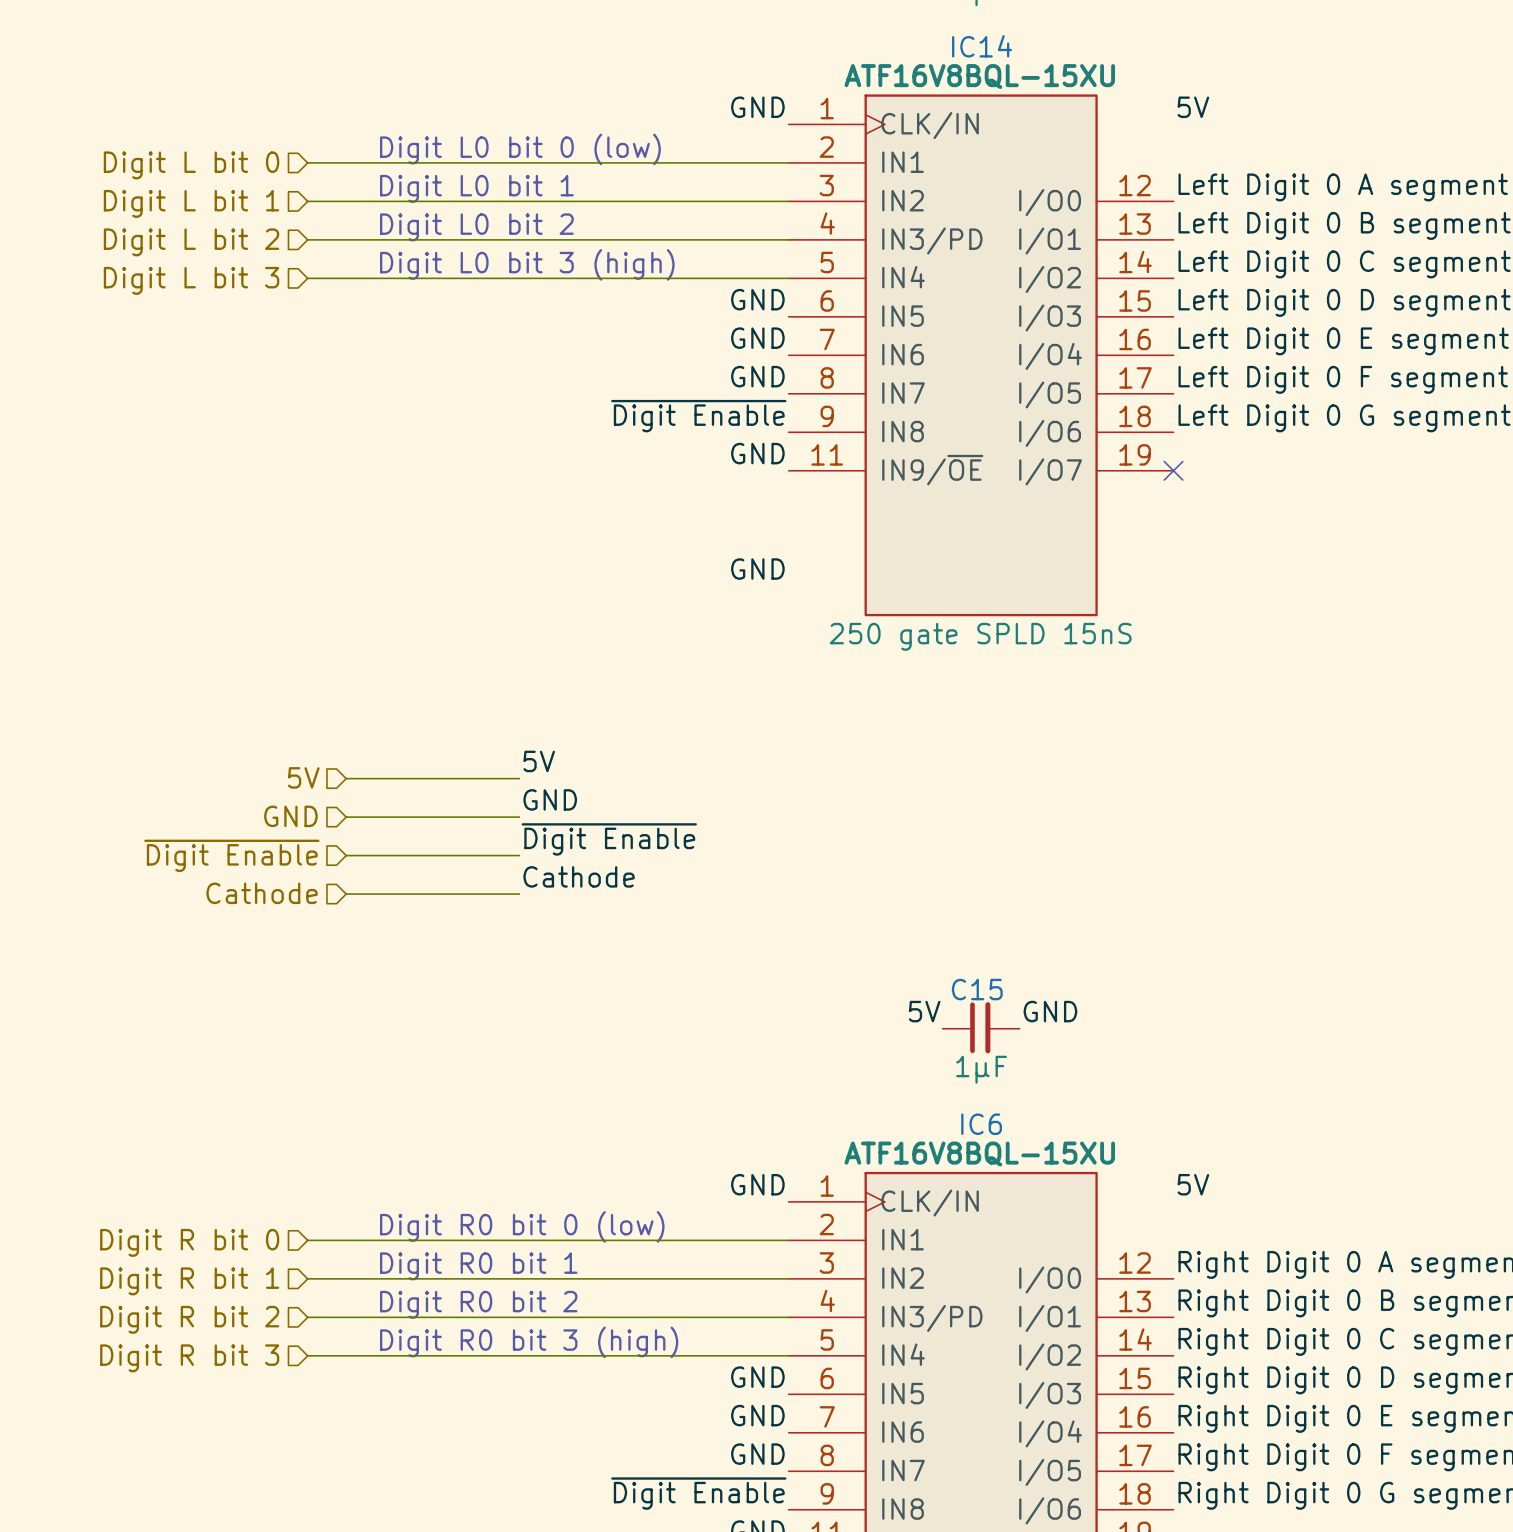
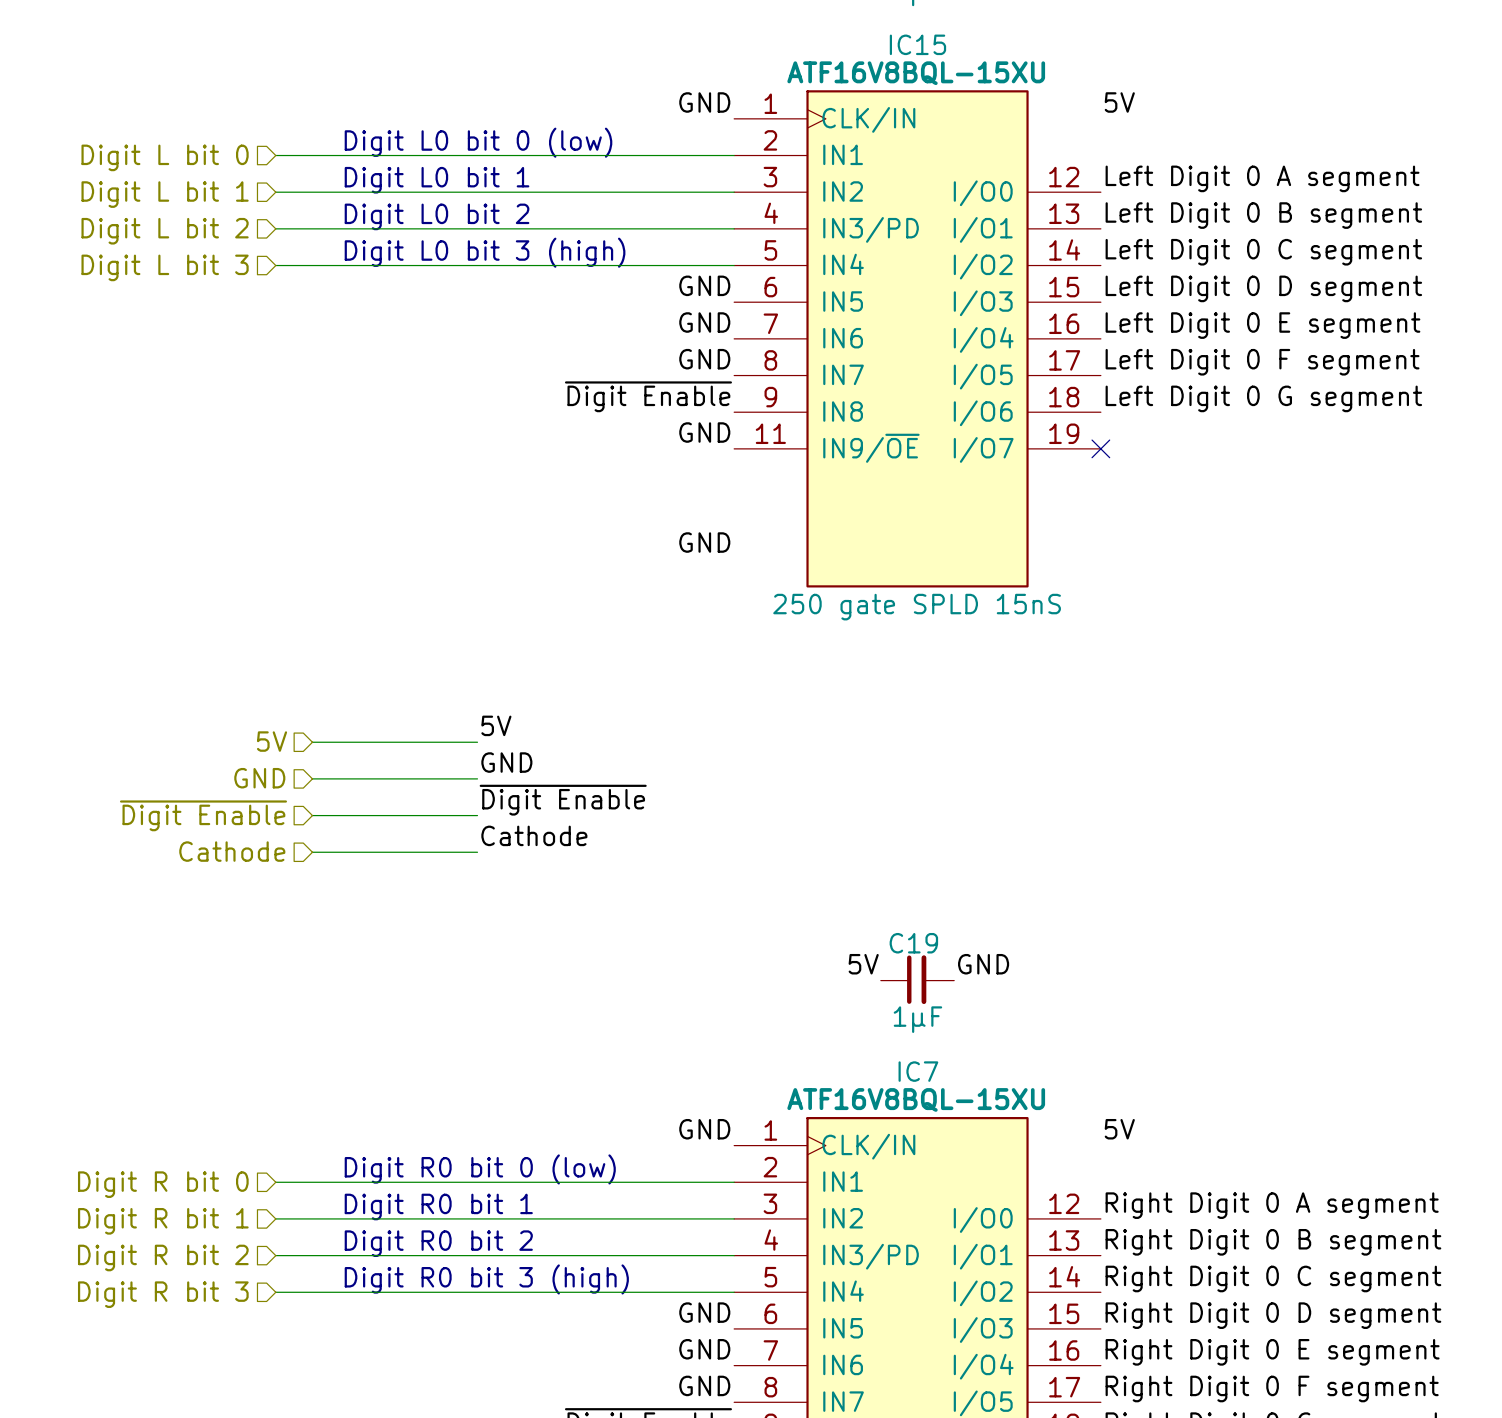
IC14 name: IC14 (982, 46) -> IC15 (917, 44)
C15 name: C15 (977, 989) -> C19 (913, 943)
IC6 name: IC6 (981, 1124) -> IC7 (918, 1071)

